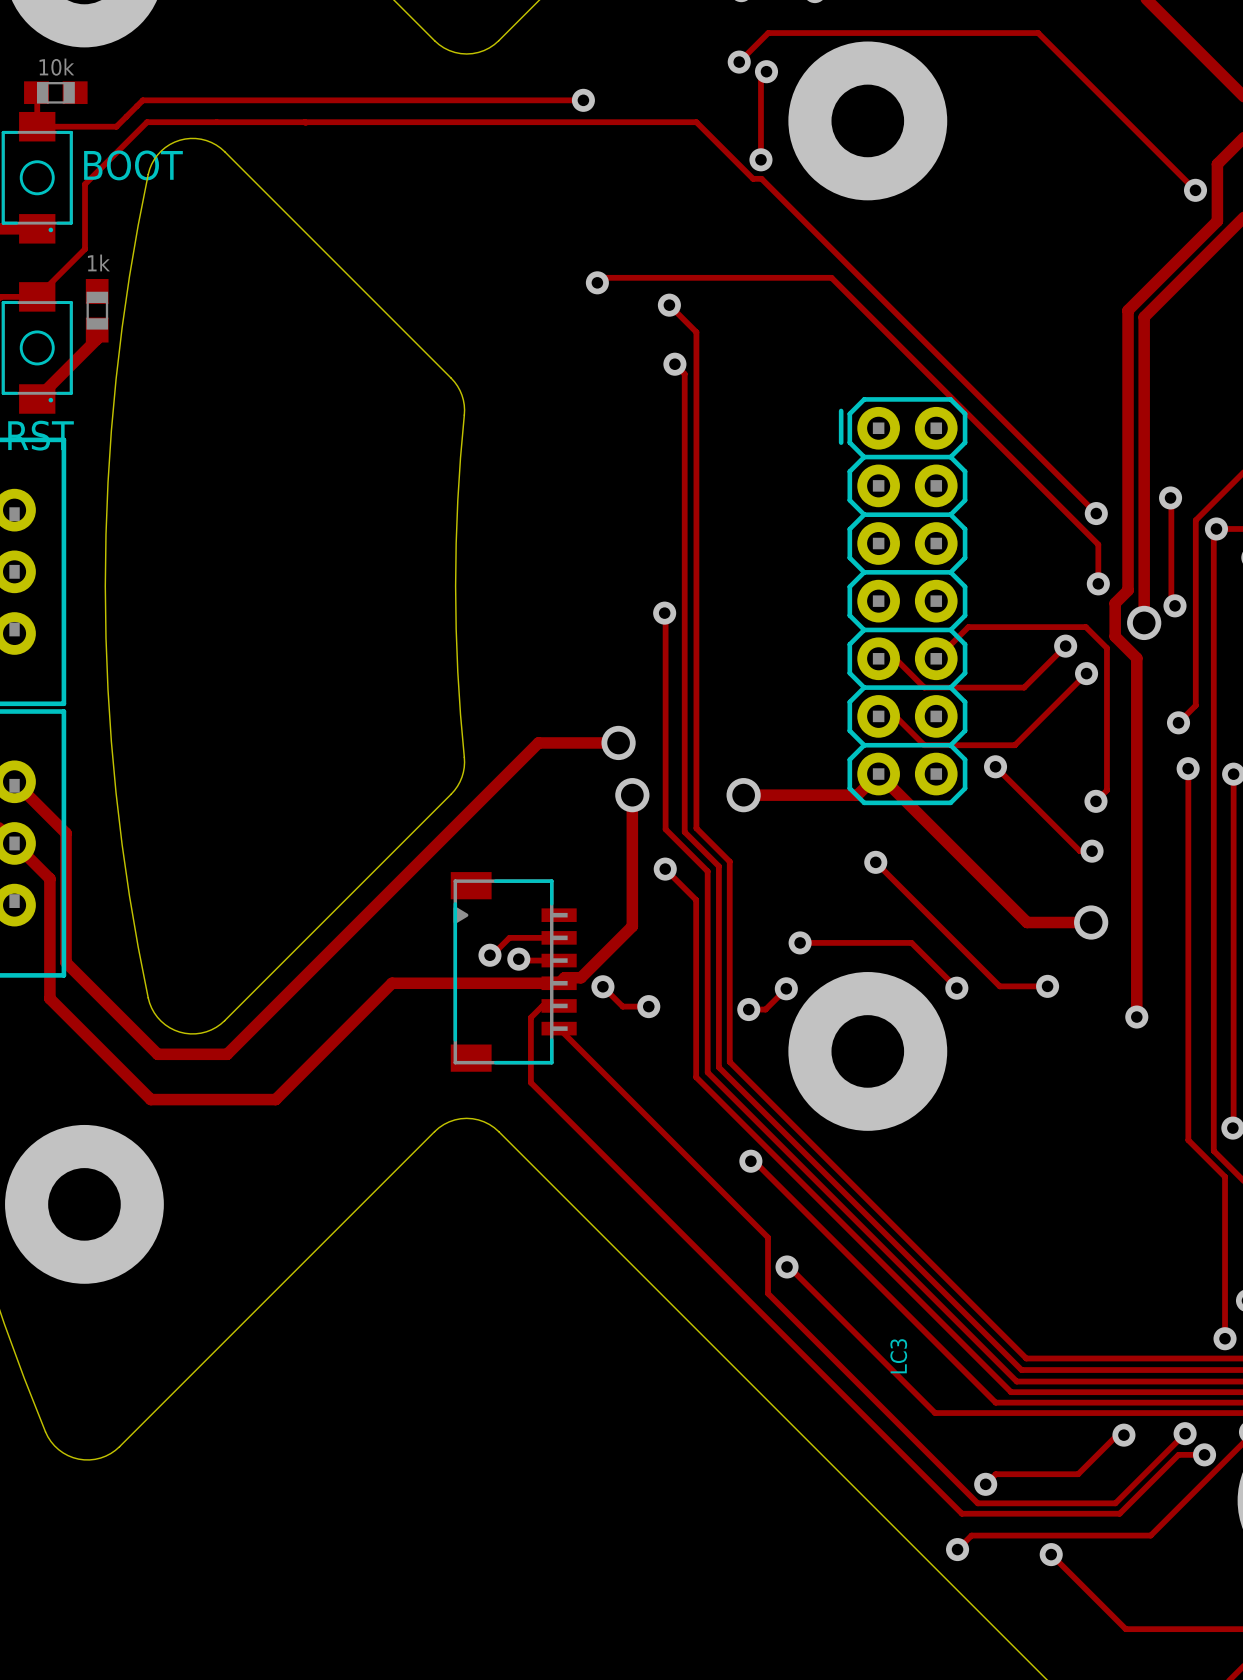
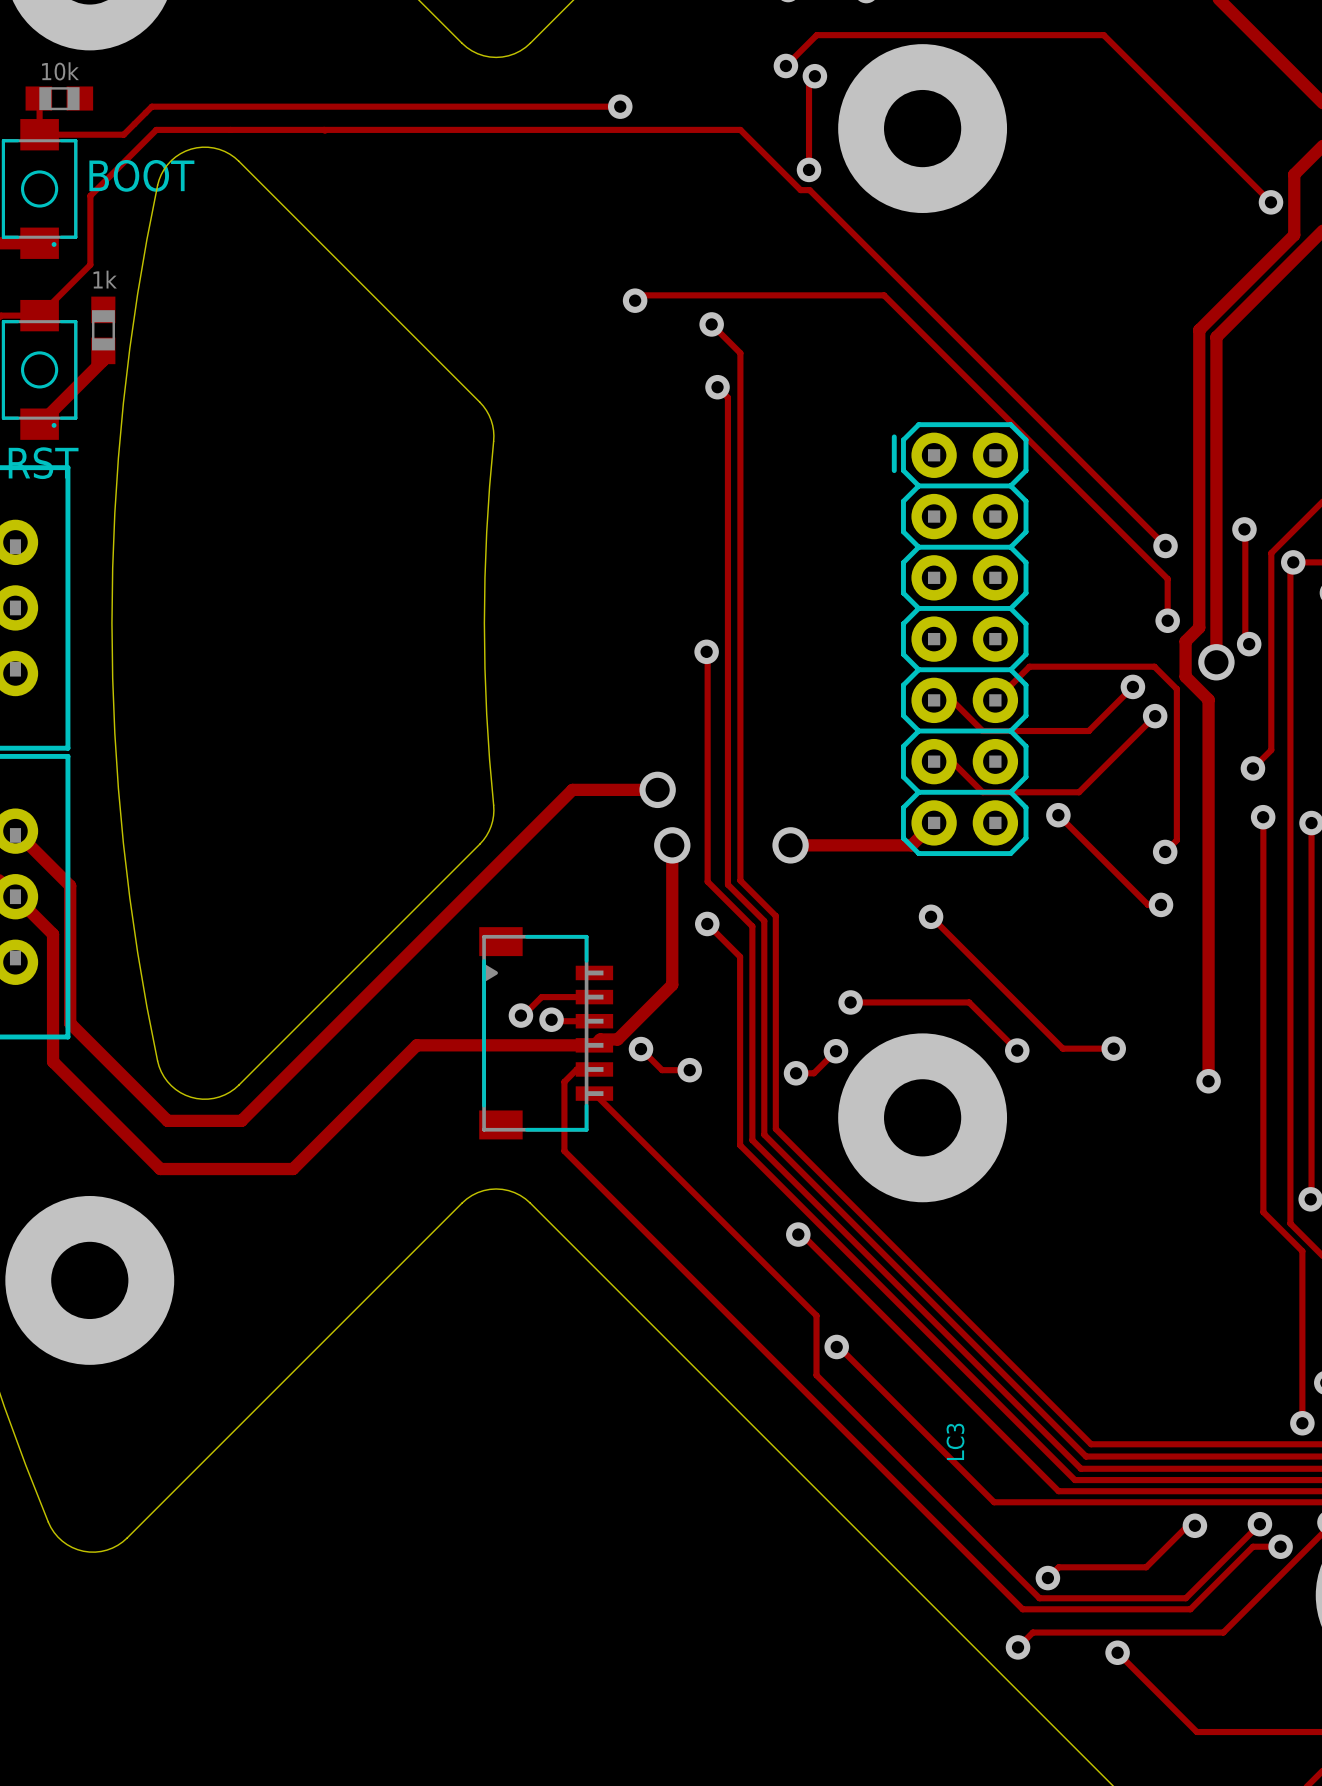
track: (878, 774) (1027, 922) (1091, 922) -> none
via: (1091, 922) -> none

